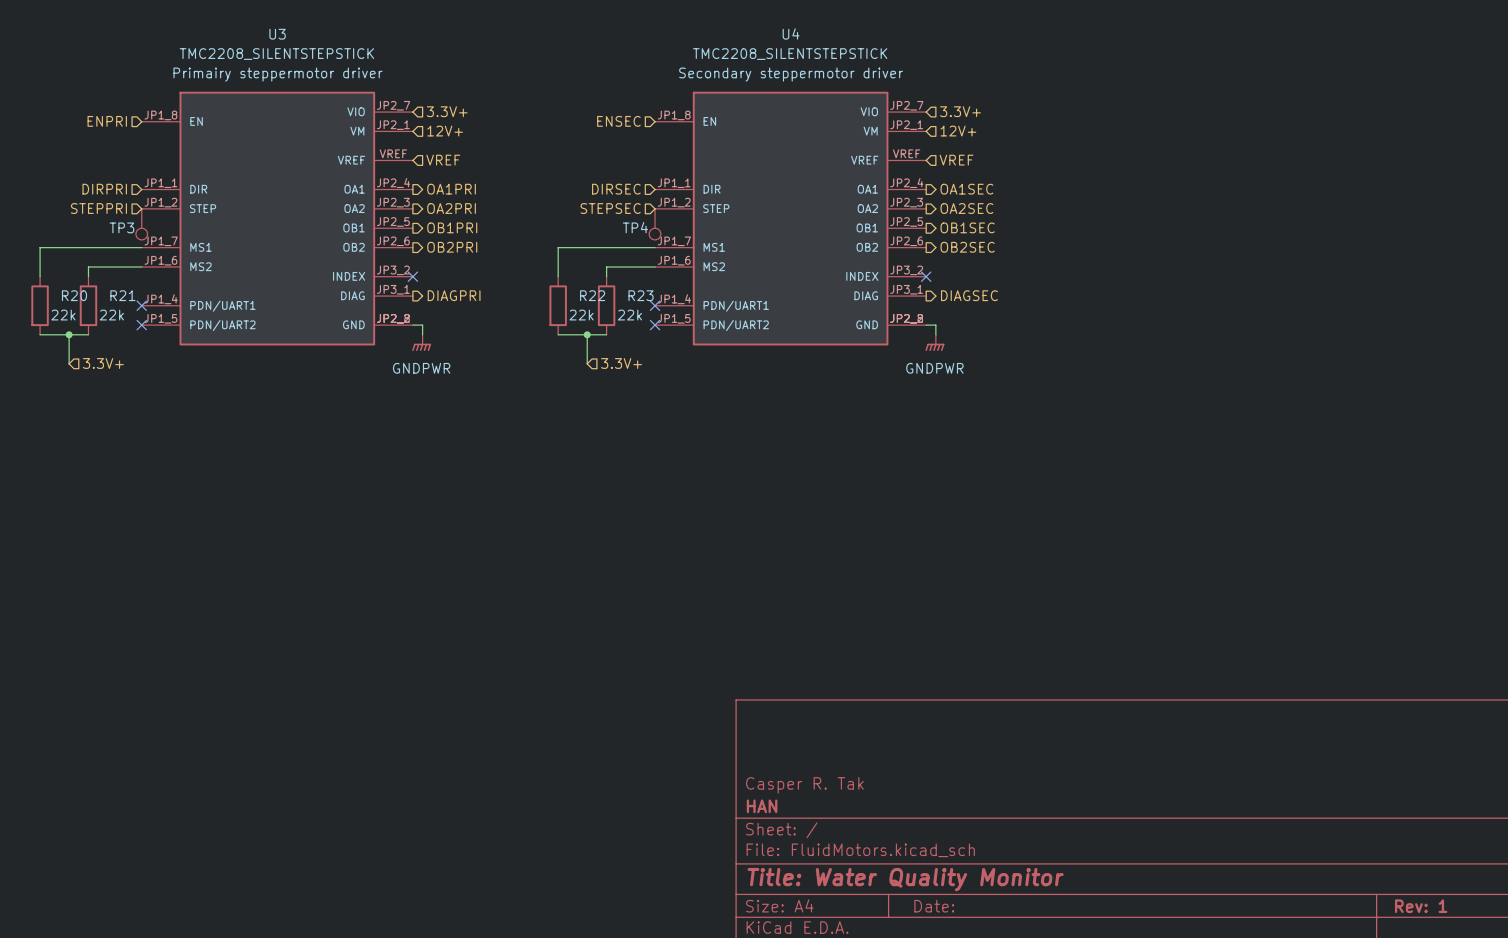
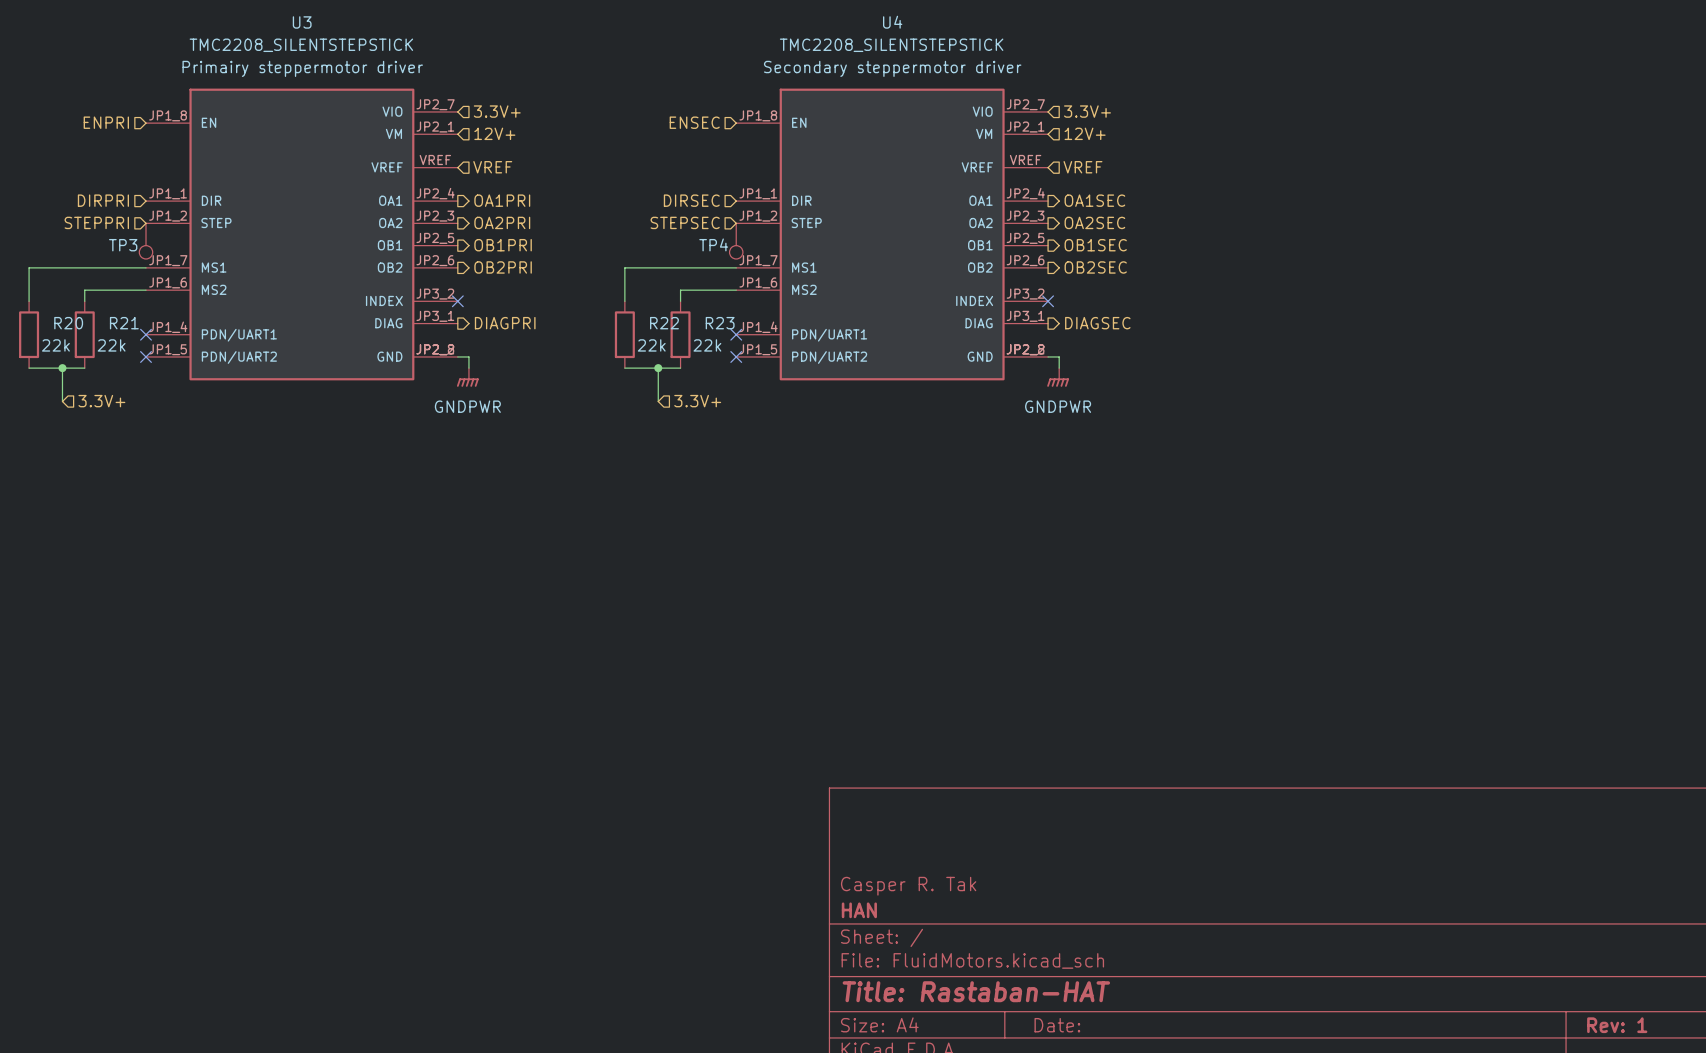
title block: Title: Water Quality Monitor (905, 879) -> Title: Rastaban-HAT (976, 991)

